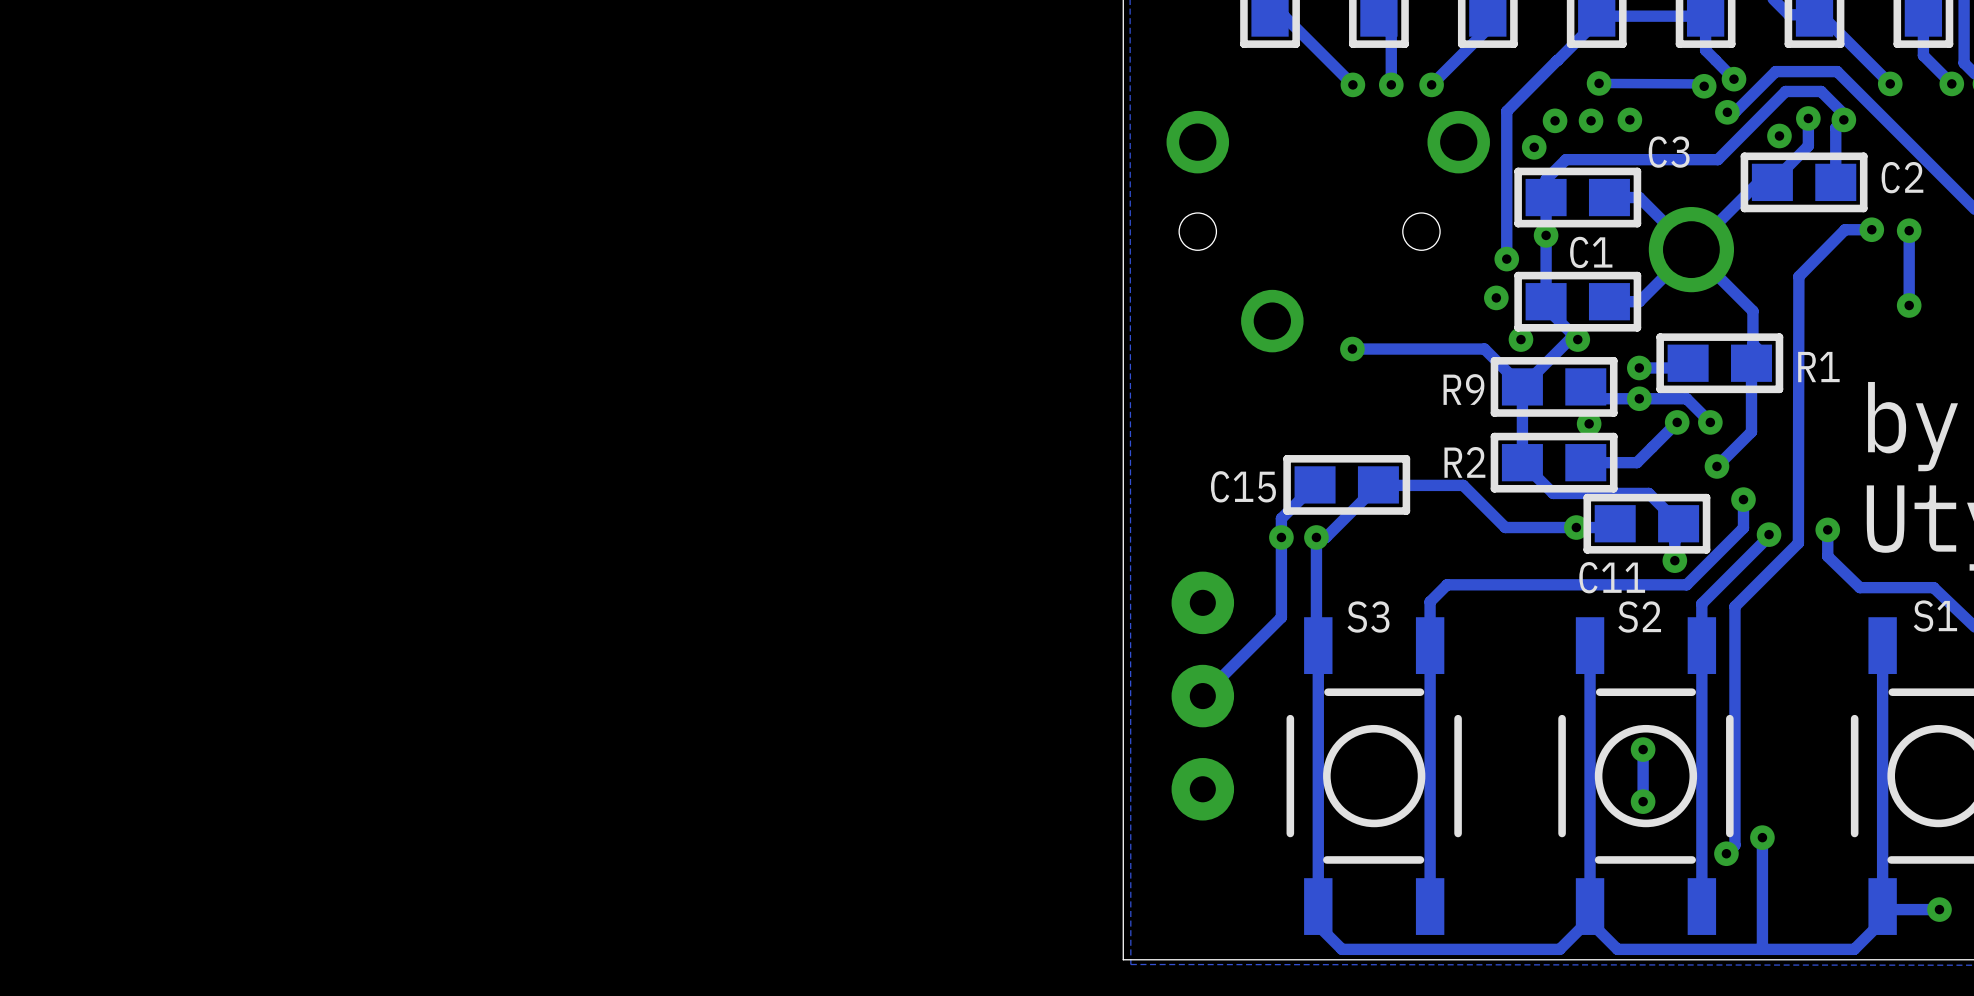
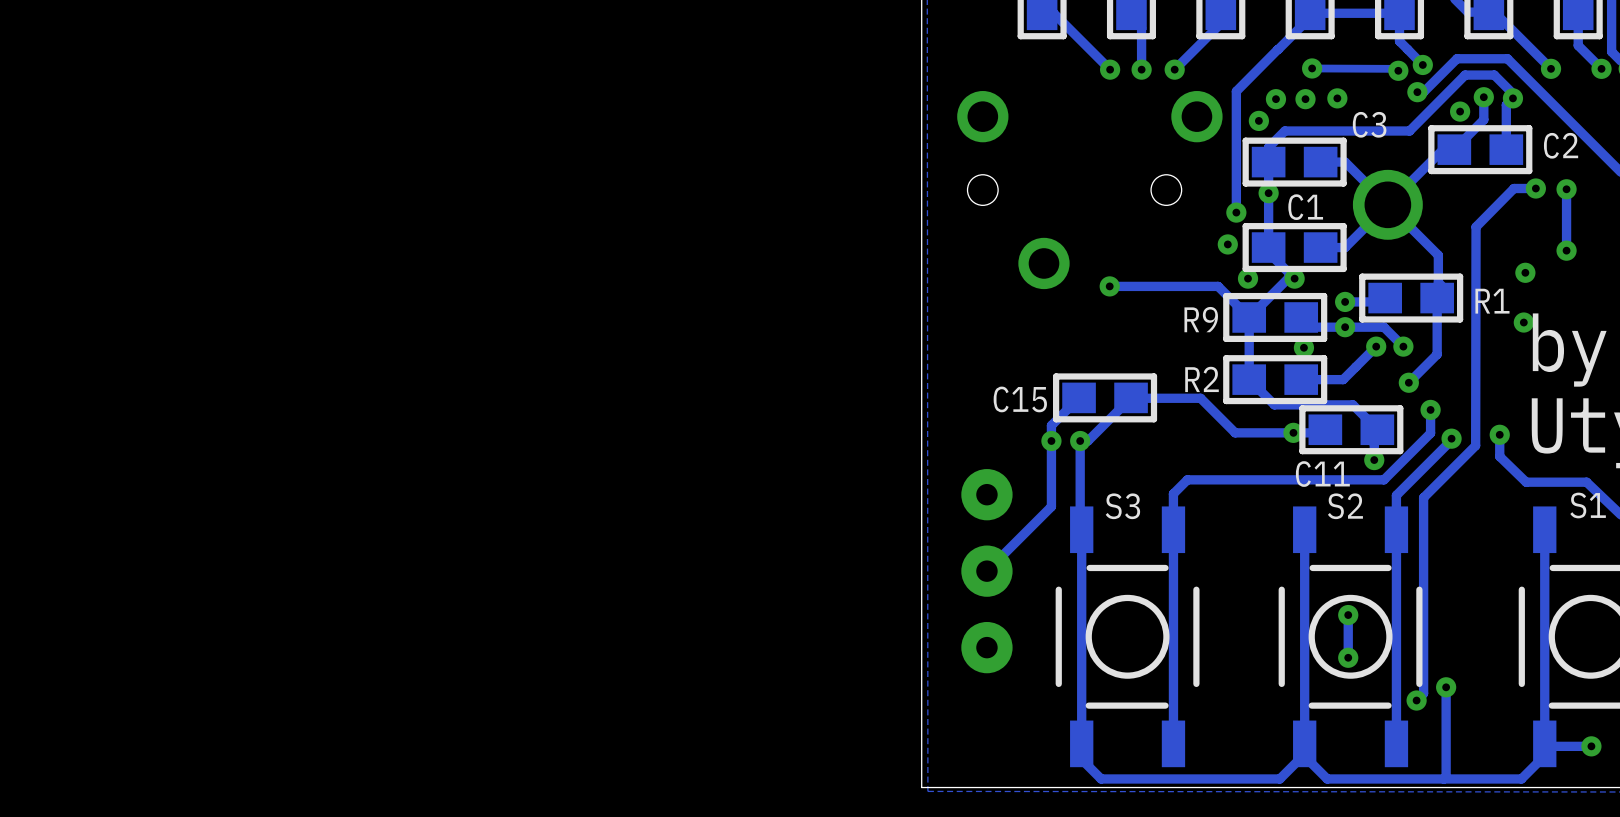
via: none -> (1525, 272)
via: none -> (1523, 322)

